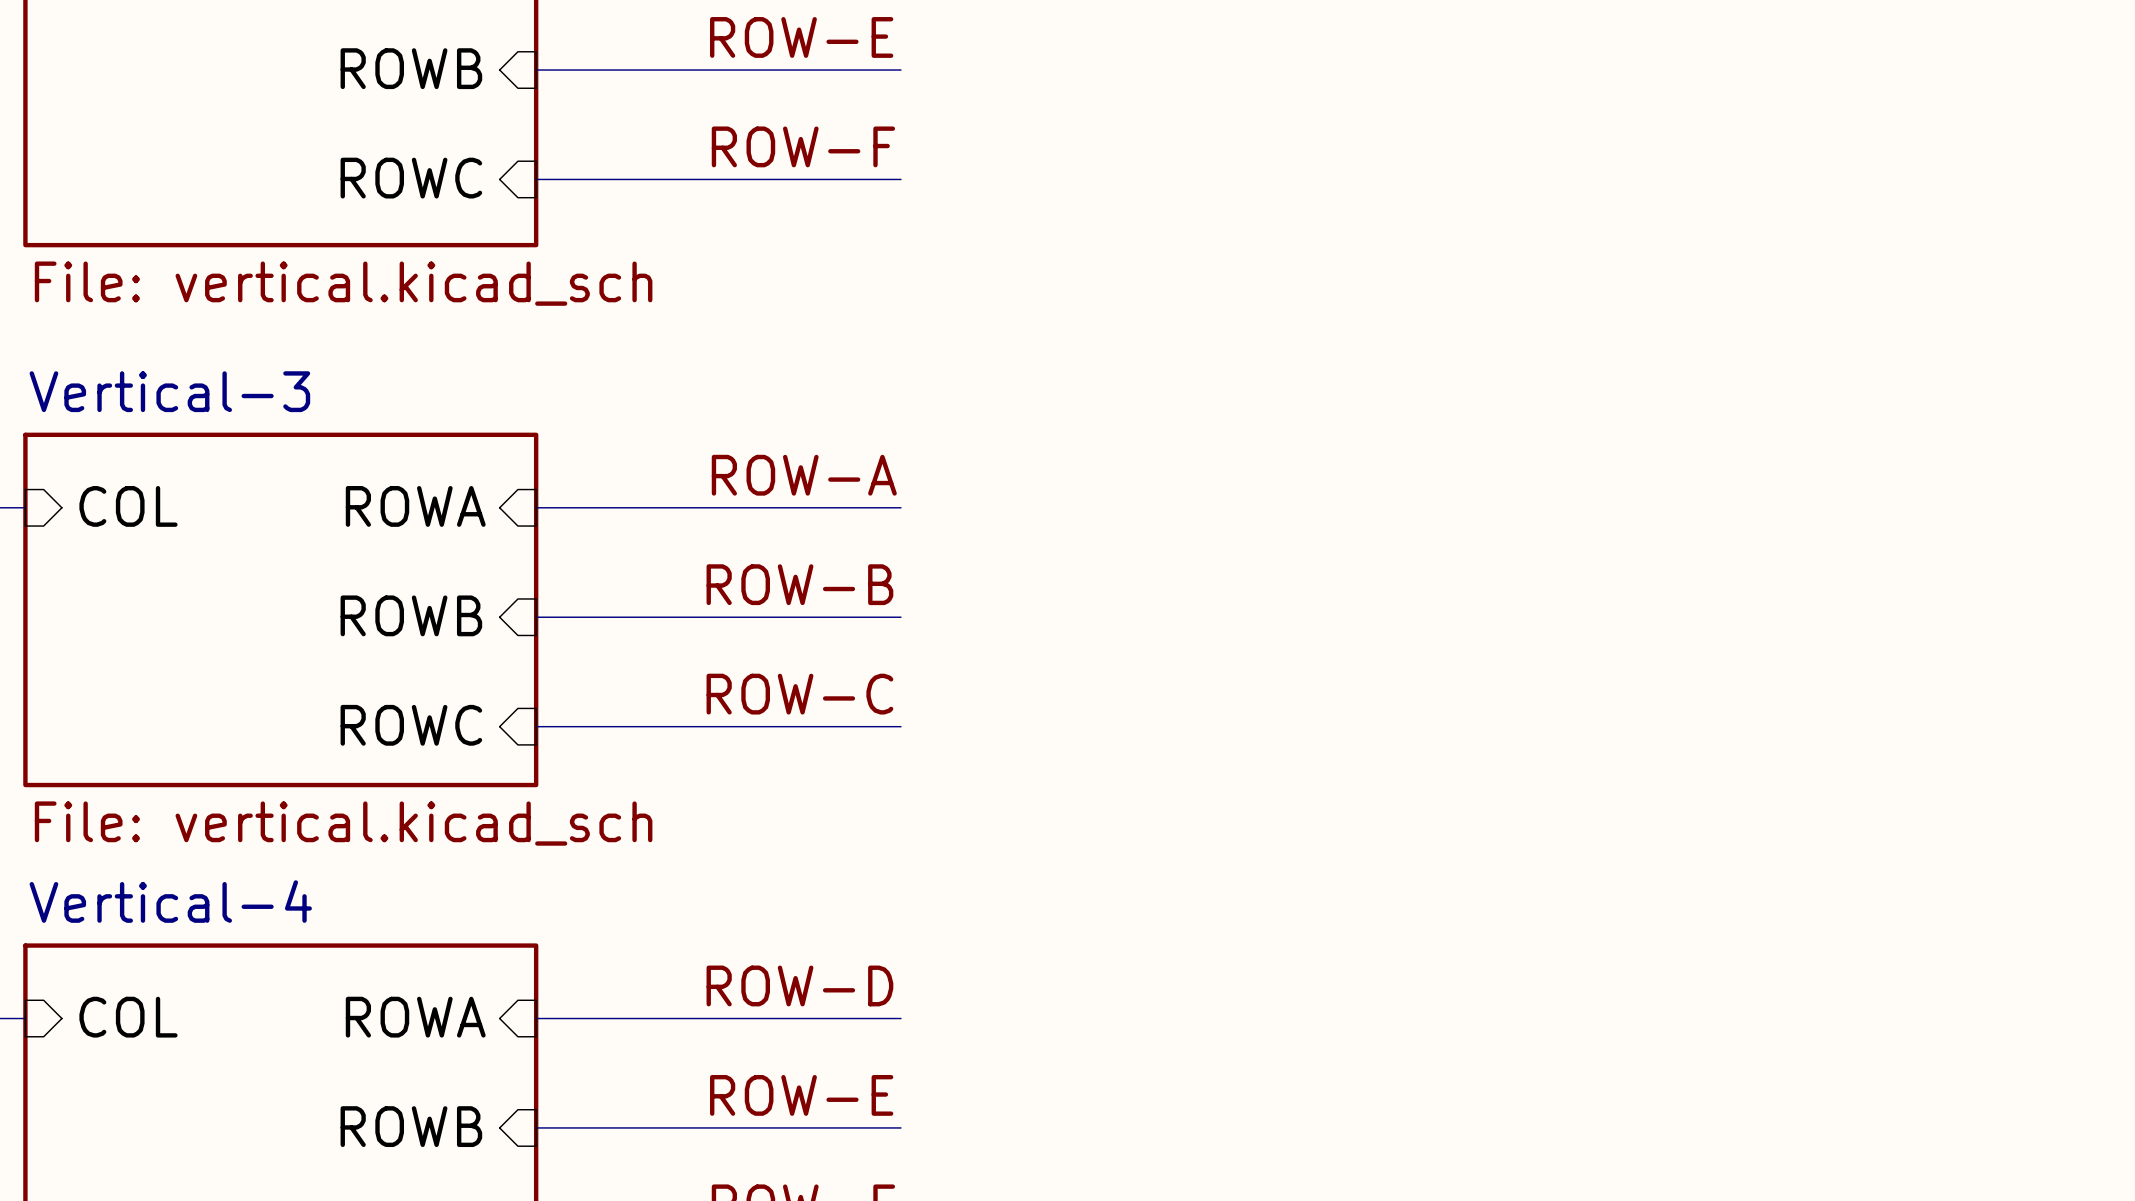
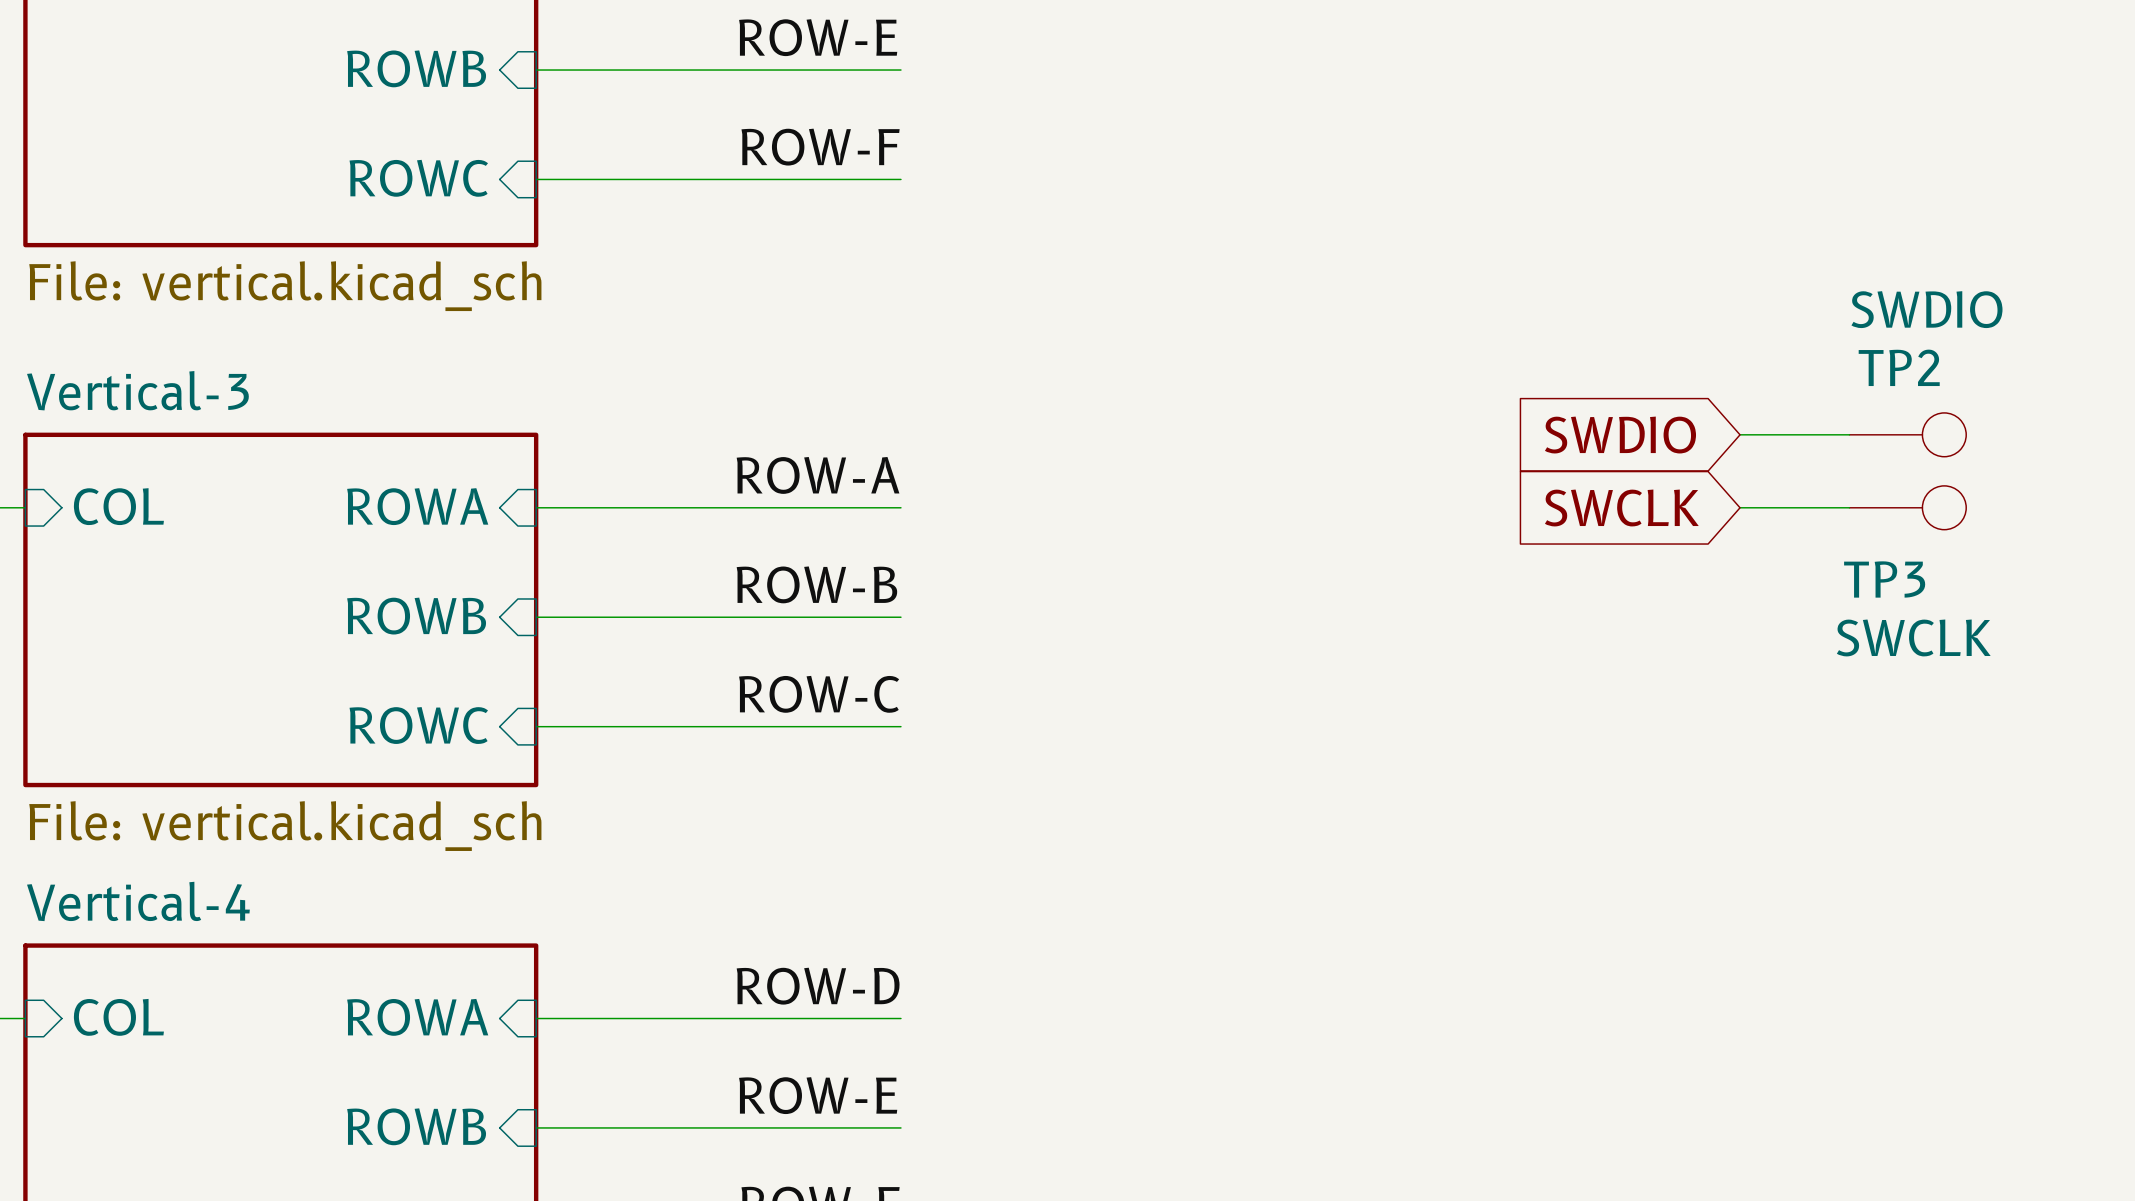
global label: none -> SWDIO (1620, 435)
wire: none -> (1740, 434) (1849, 434)
TP2: none -> SWDIO (1907, 434)
global label: none -> SWCLK (1621, 507)
wire: none -> (1740, 507) (1849, 507)
TP3: none -> SWCLK (1907, 507)

